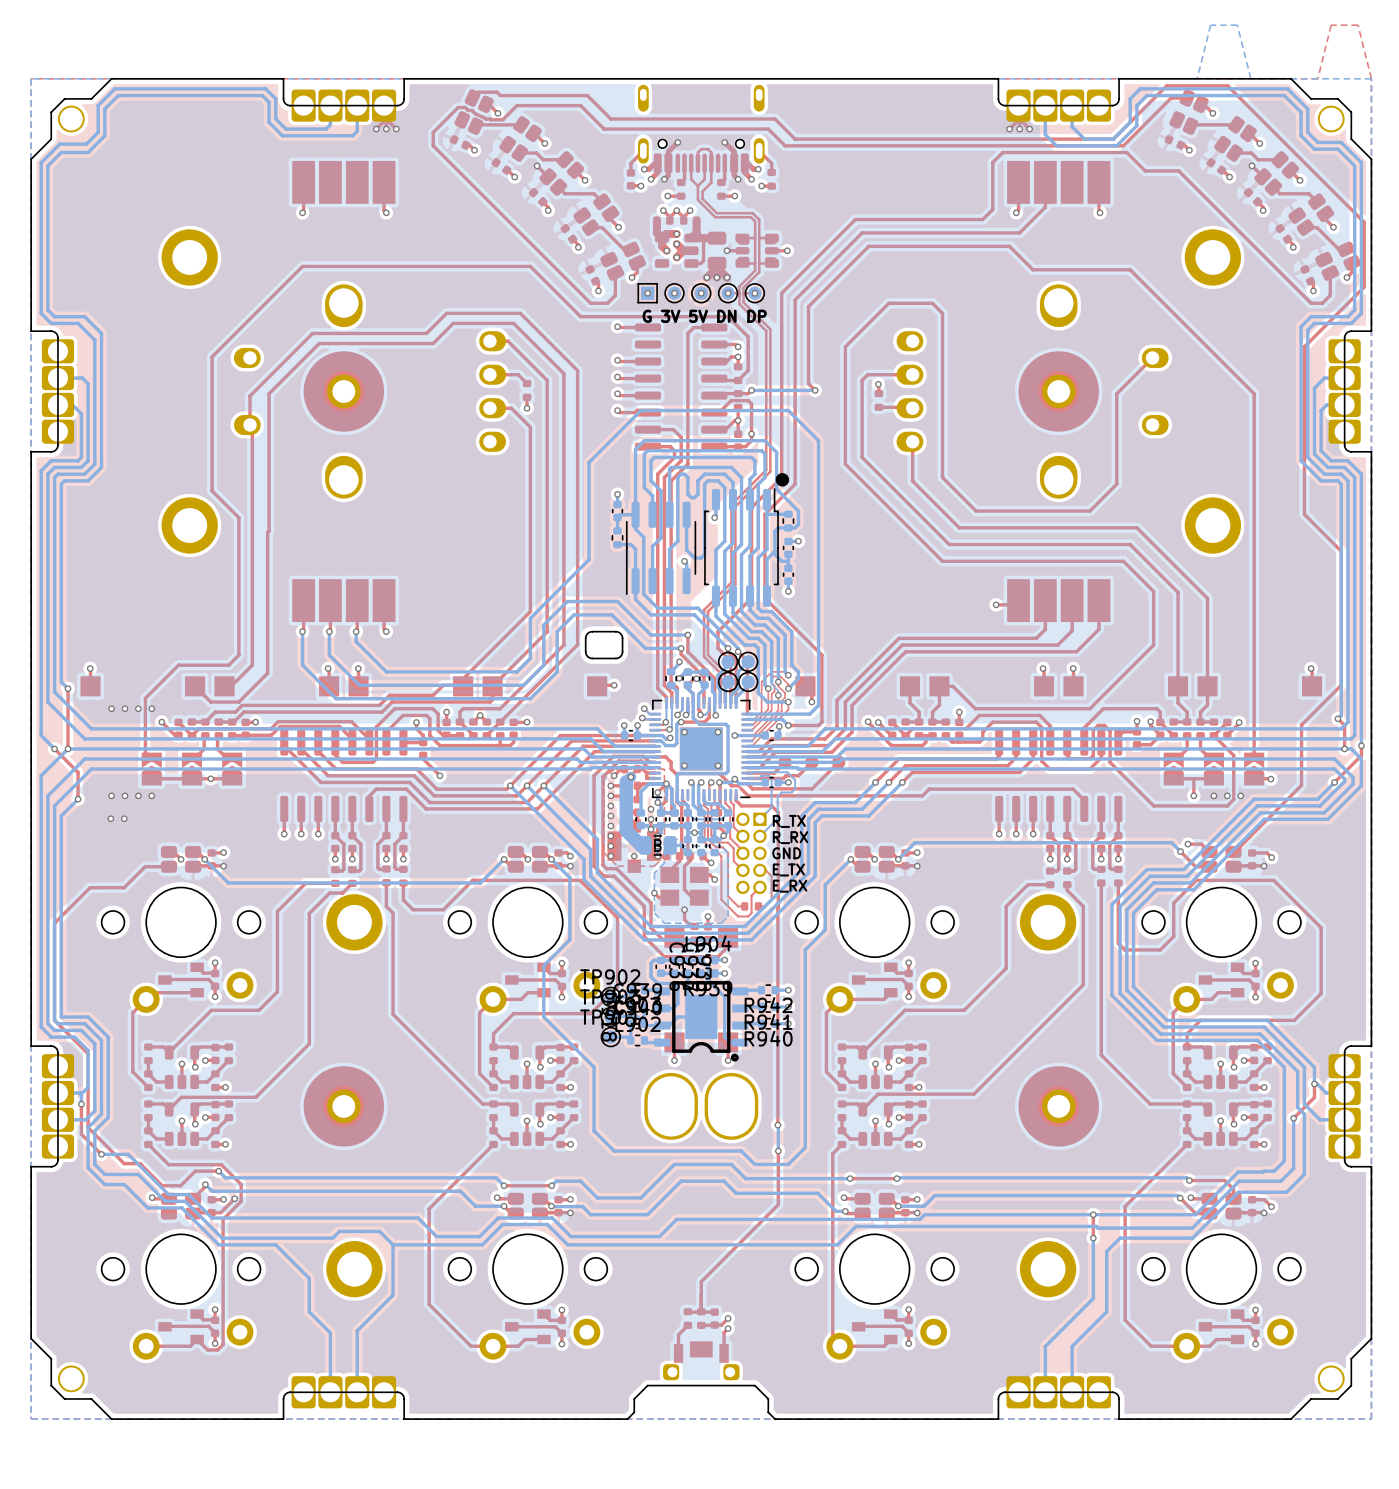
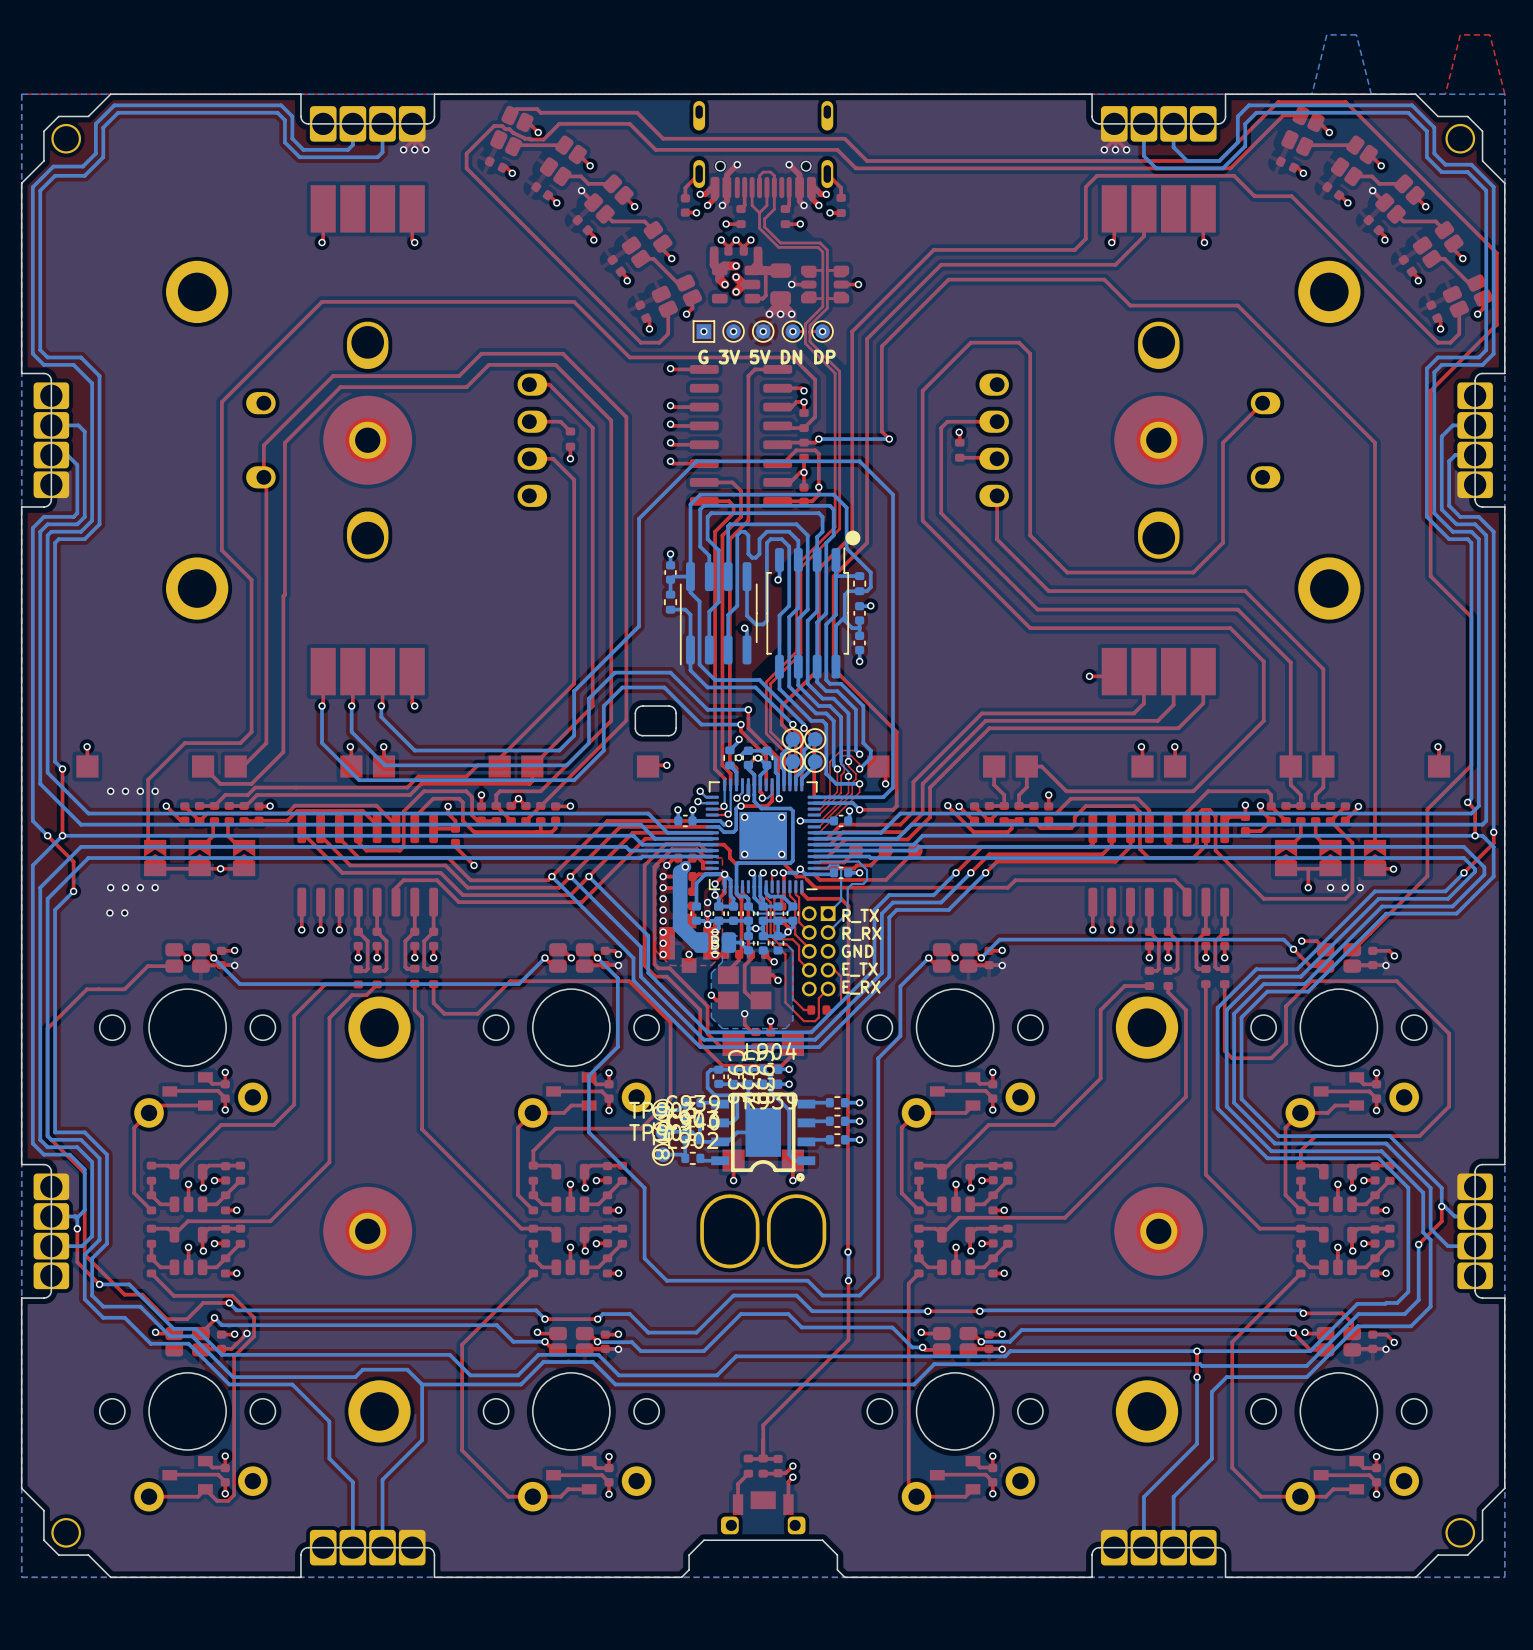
TP902 name: TP902 (610, 976) -> none
R942 name: R942 (768, 1005) -> none
R941 name: R941 (768, 1021) -> none
R940 name: R940 (768, 1038) -> none

